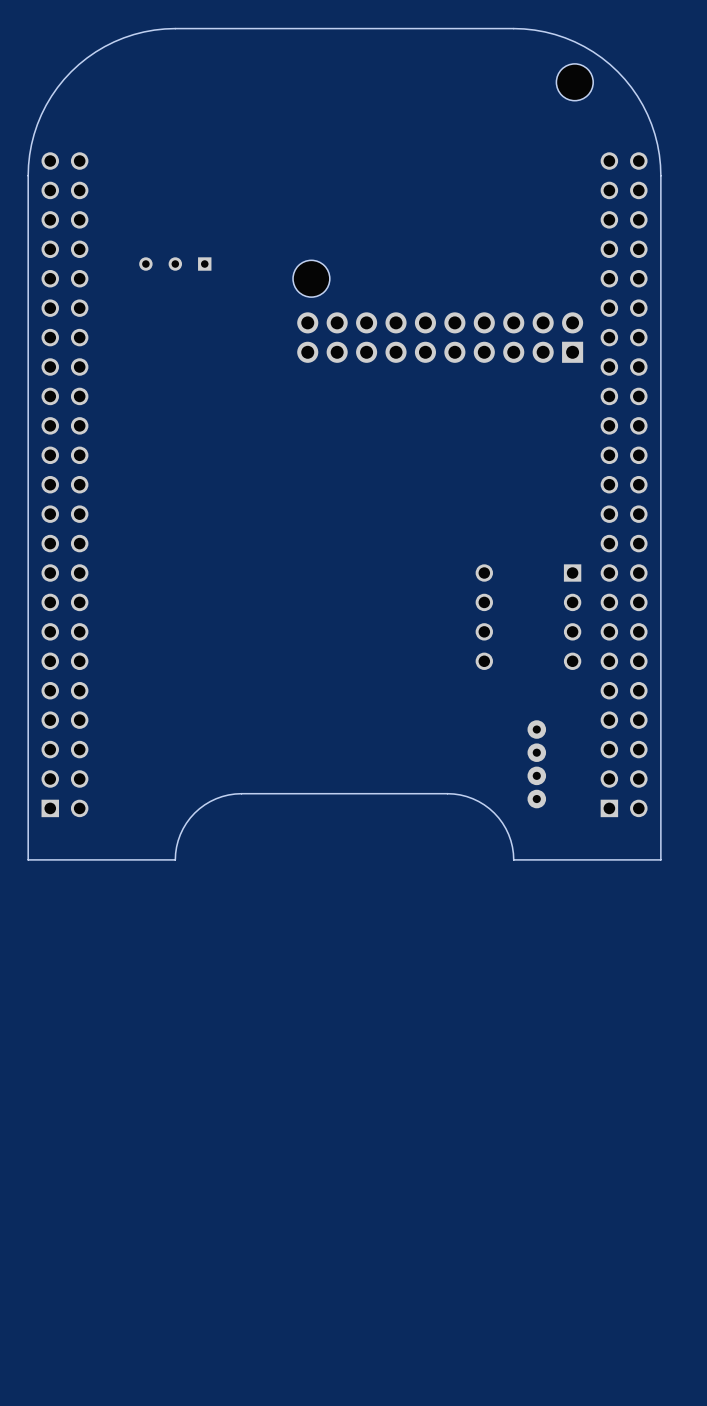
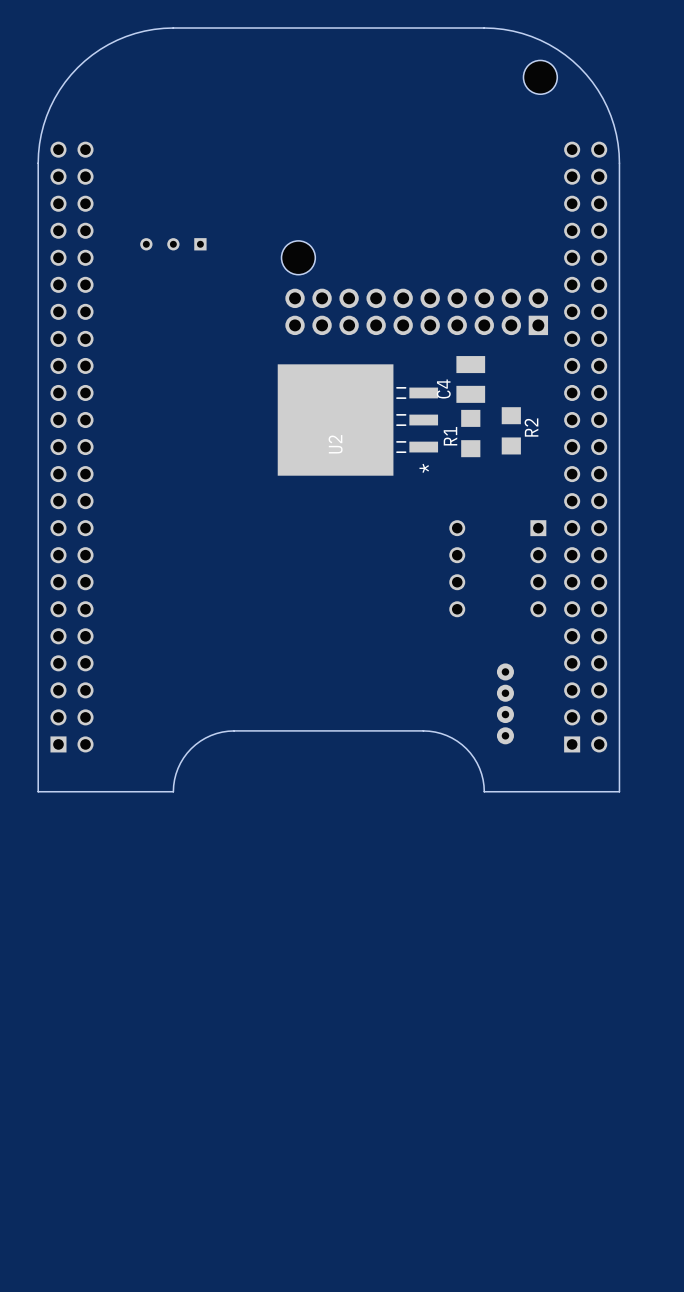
C4: none -> (470, 379)
part: none -> (357, 420)
R2: none -> (511, 430)
R1: none -> (470, 433)

